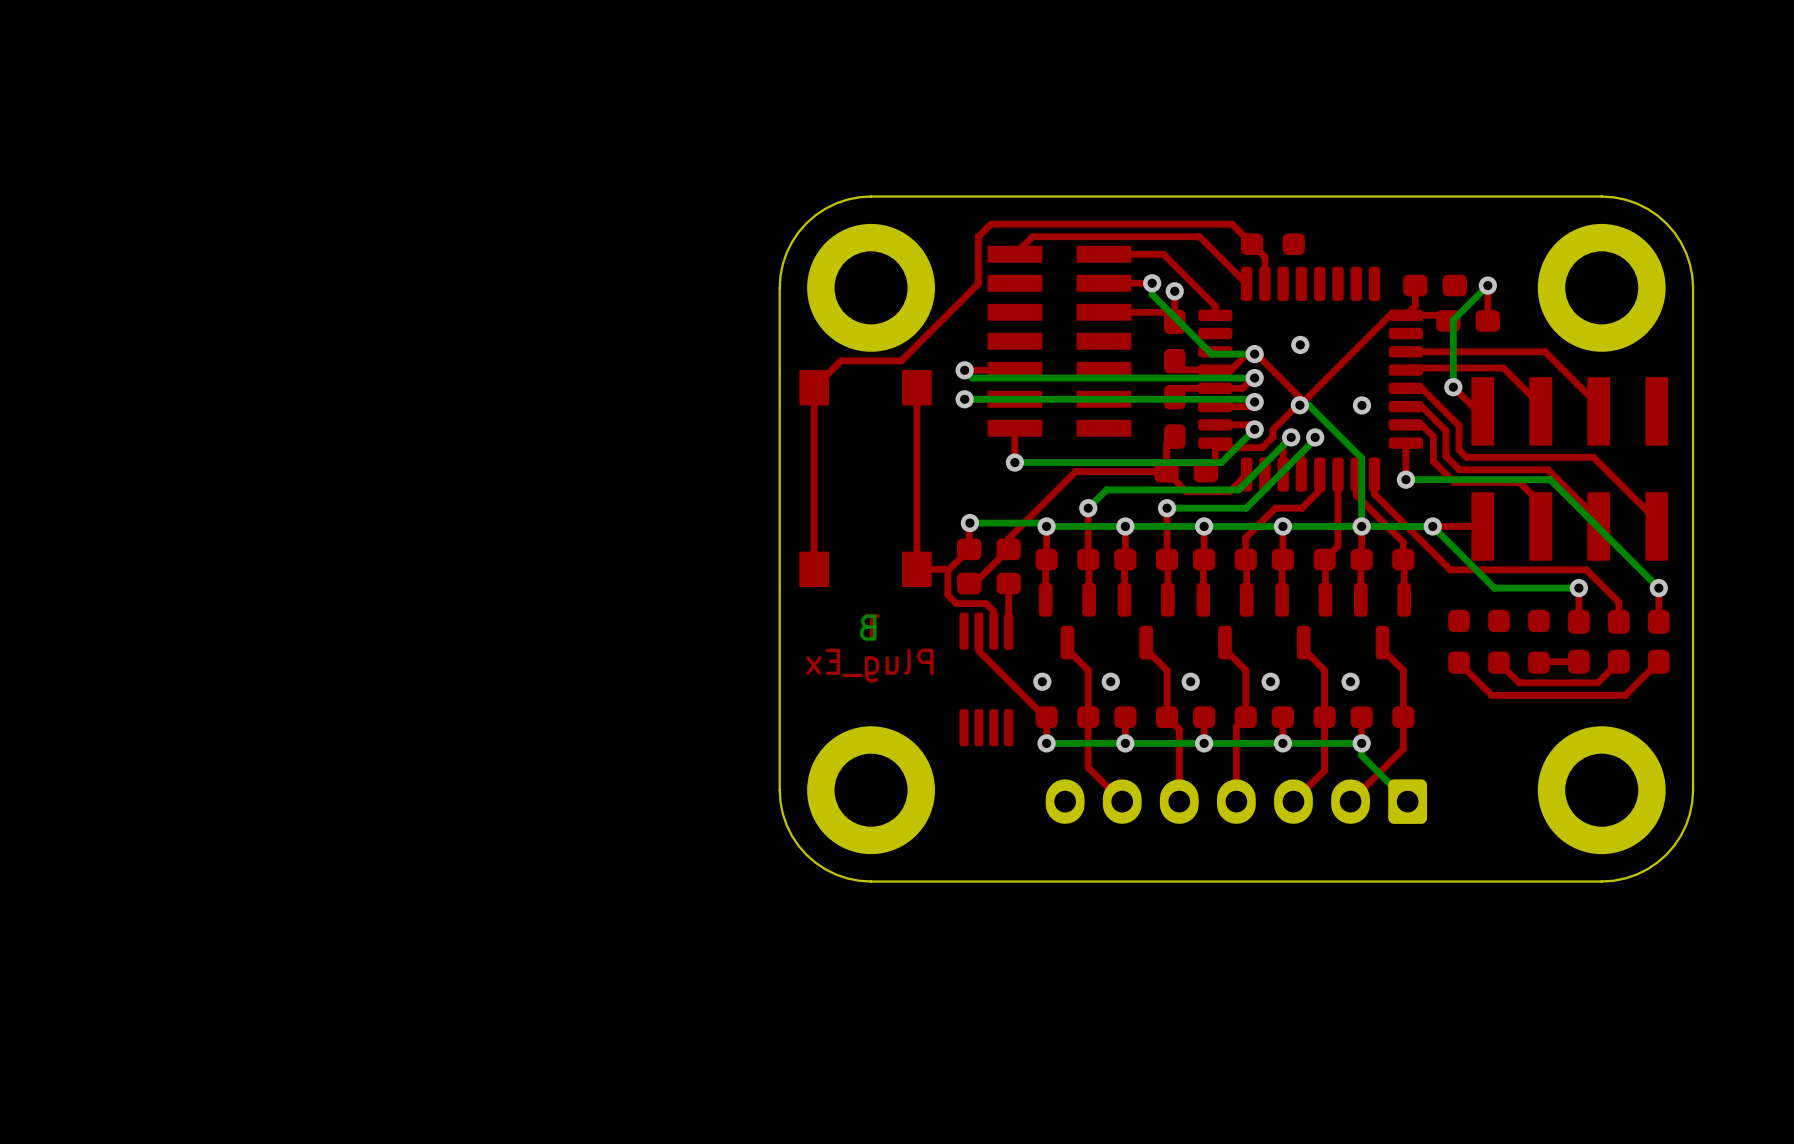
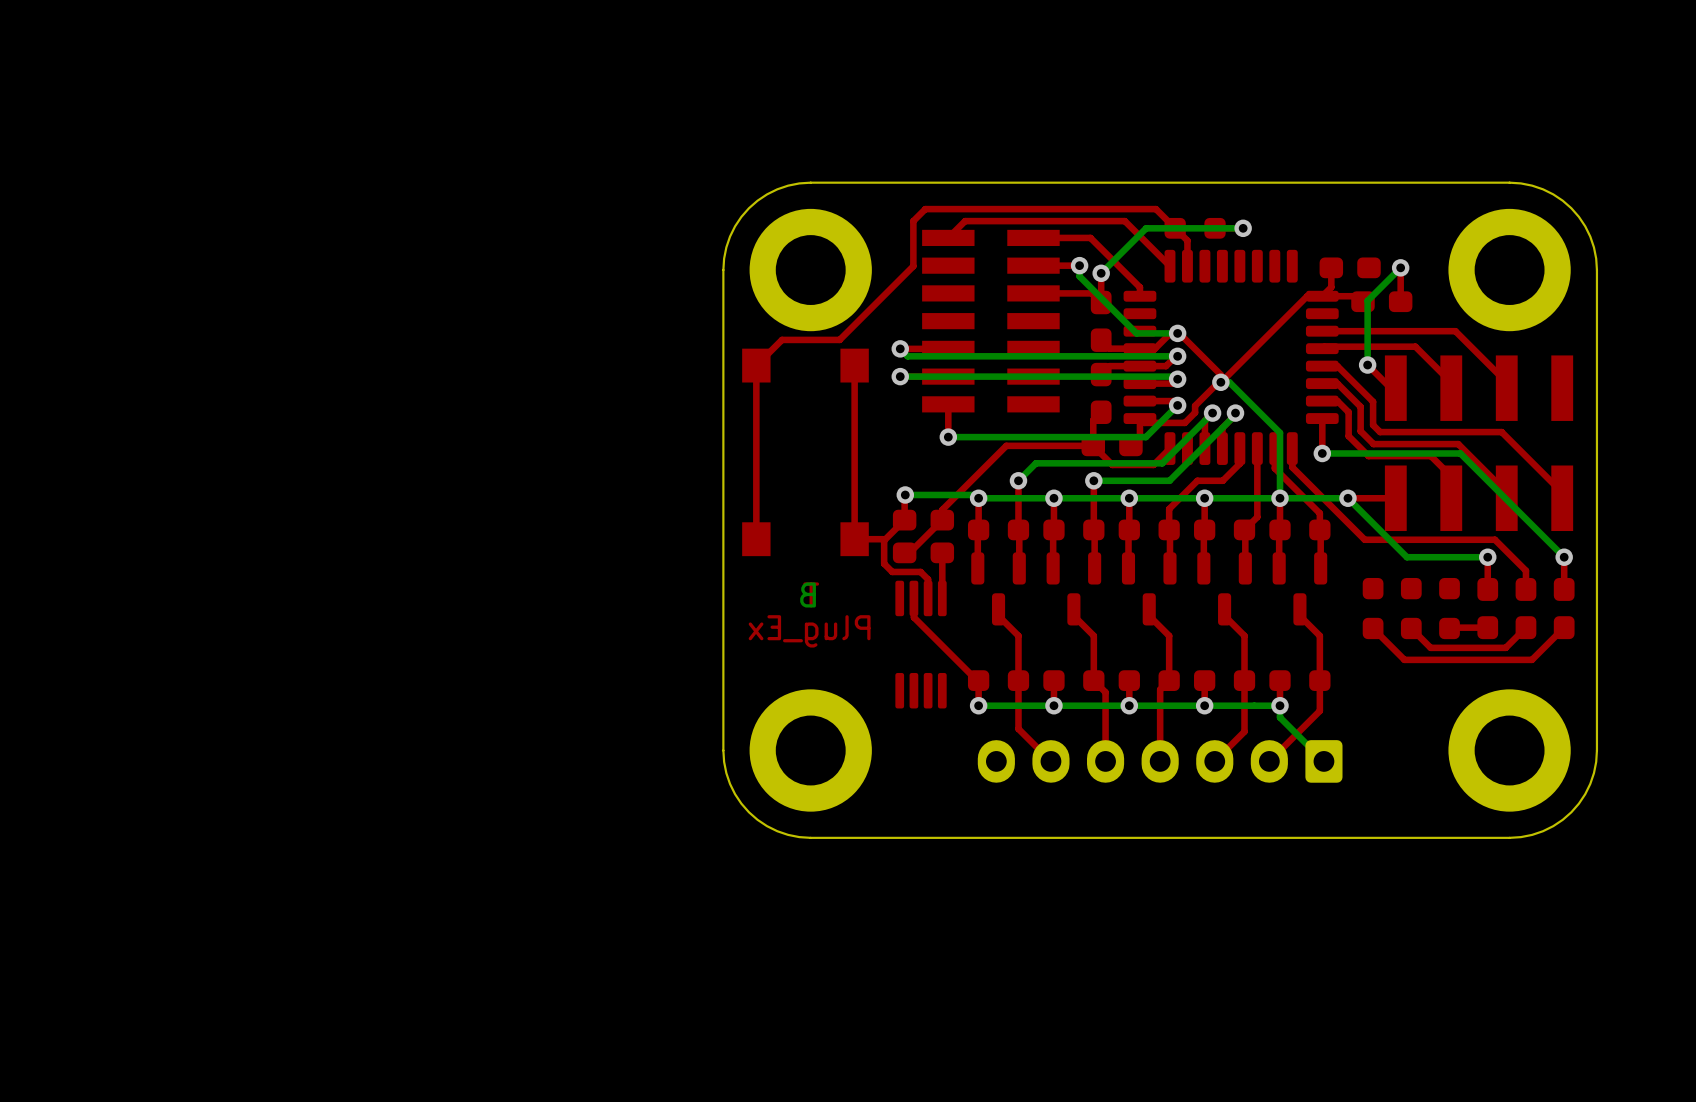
bottom track: none -> (1243, 228) (1146, 228) (1101, 273)
via: none -> (1243, 228)
via: (1300, 344) -> none
via: (1361, 405) -> none
via: (1042, 681) -> none
via: (1110, 681) -> none
via: (1190, 681) -> none
via: (1270, 681) -> none
via: (1350, 681) -> none

